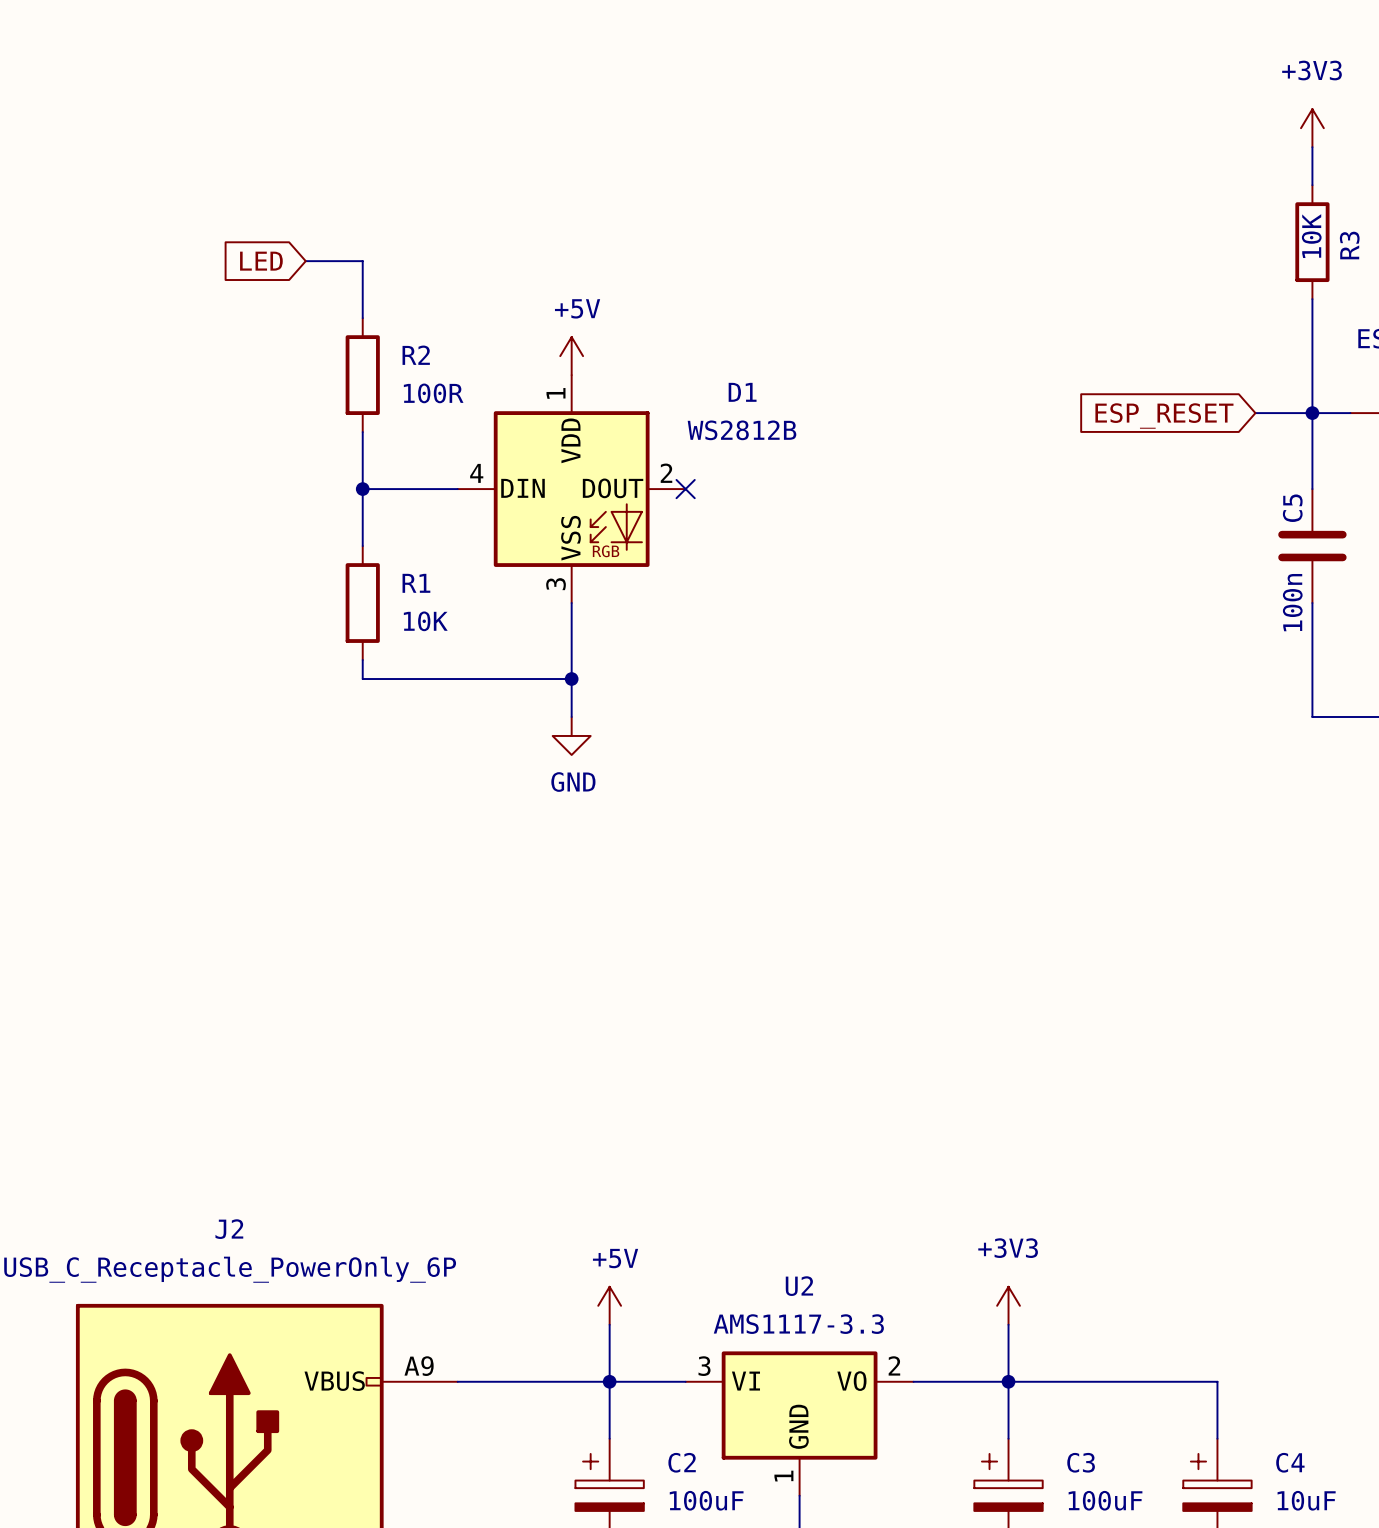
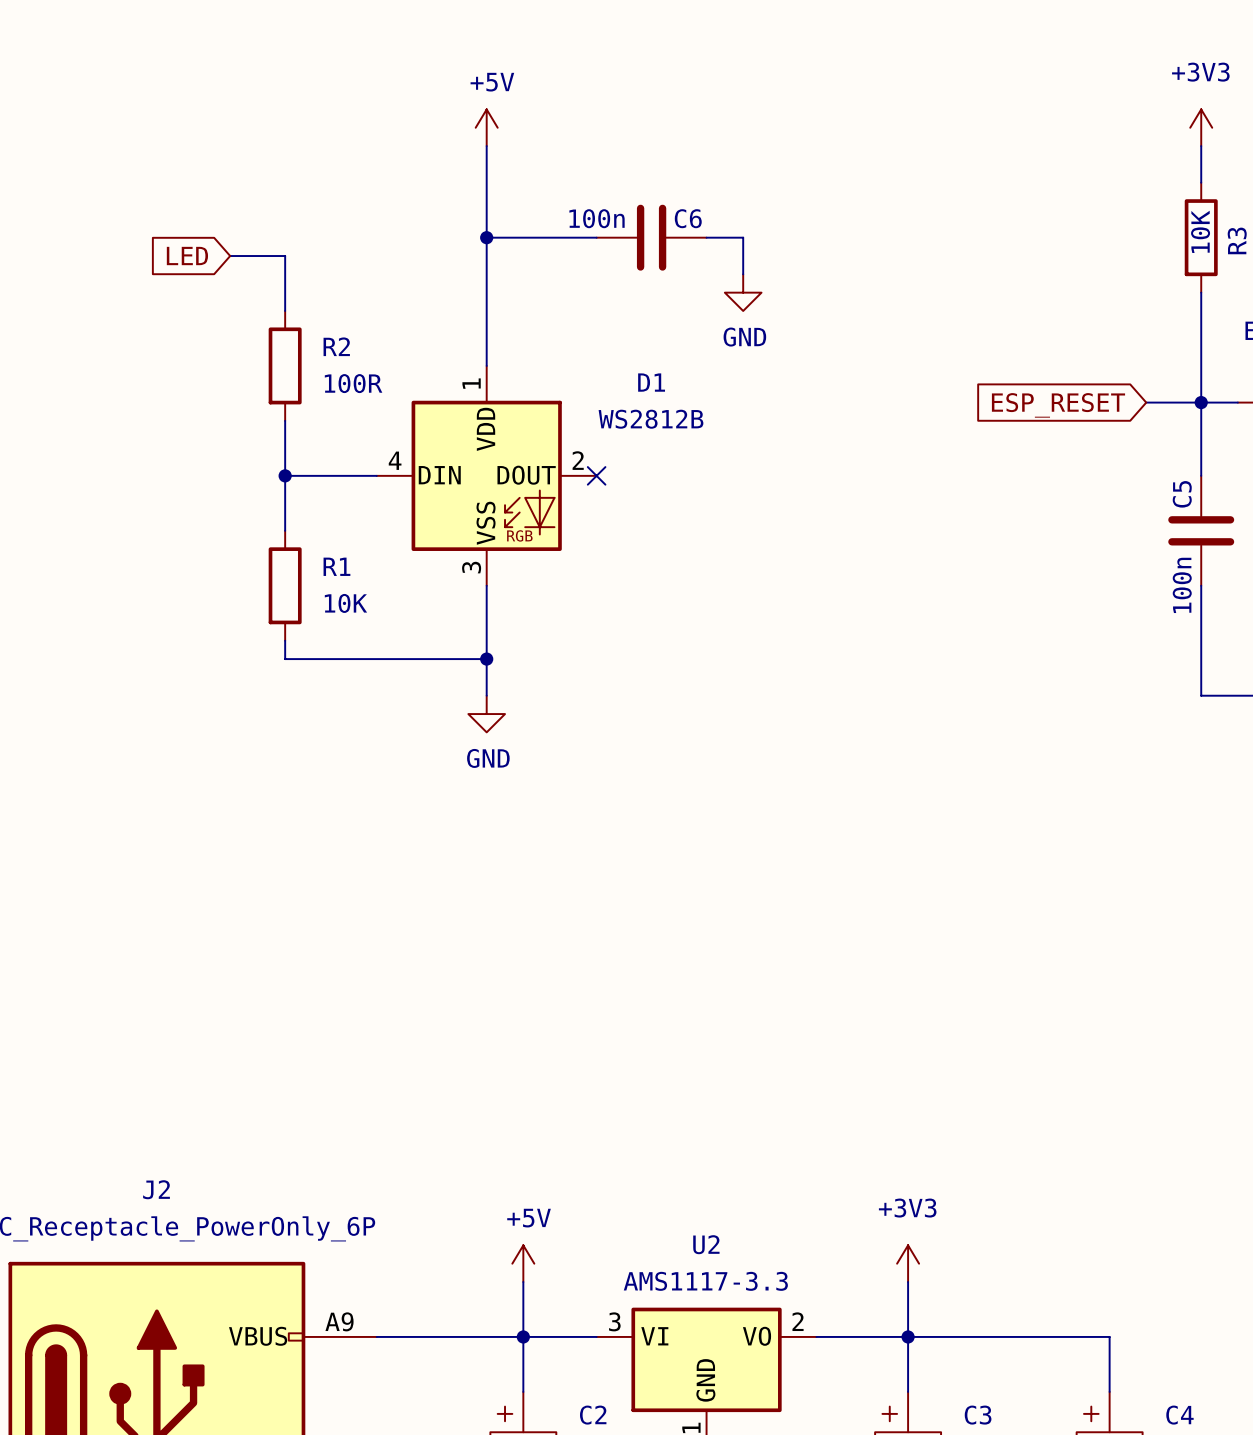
wire: none -> (486, 146) (486, 365)
wire: none -> (486, 237) (596, 237)
junction: none -> (486, 237)
C6: none -> 100n (651, 237)
wire: none -> (706, 237) (743, 237) (743, 274)
power symbol: none -> GND (743, 292)
power symbol position: +5V (571, 356) -> +5V (486, 127)

